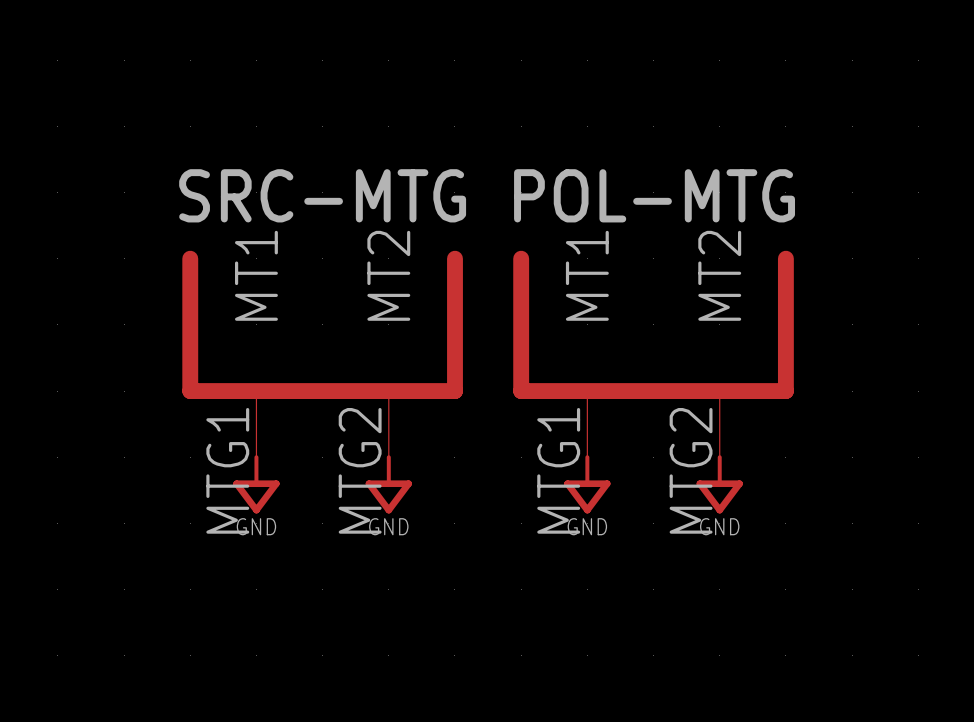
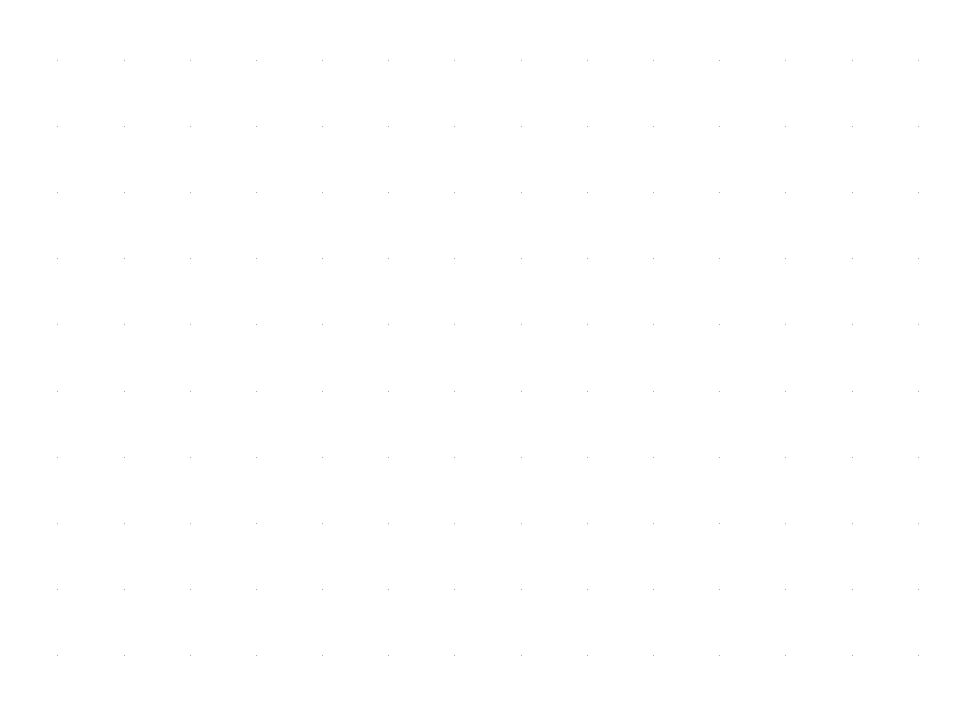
SRC-MTG: (322, 353) -> none
POL-MTG: (653, 353) -> none
power symbol: GND (256, 484) -> none
power symbol: GND (388, 484) -> none
power symbol: GND (587, 484) -> none
power symbol: GND (719, 484) -> none

